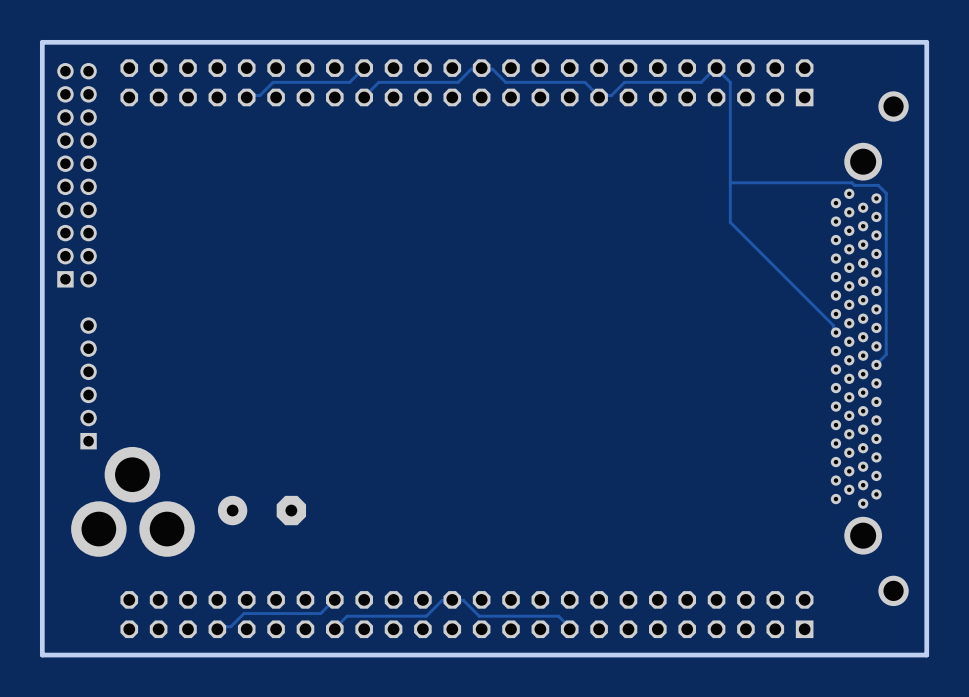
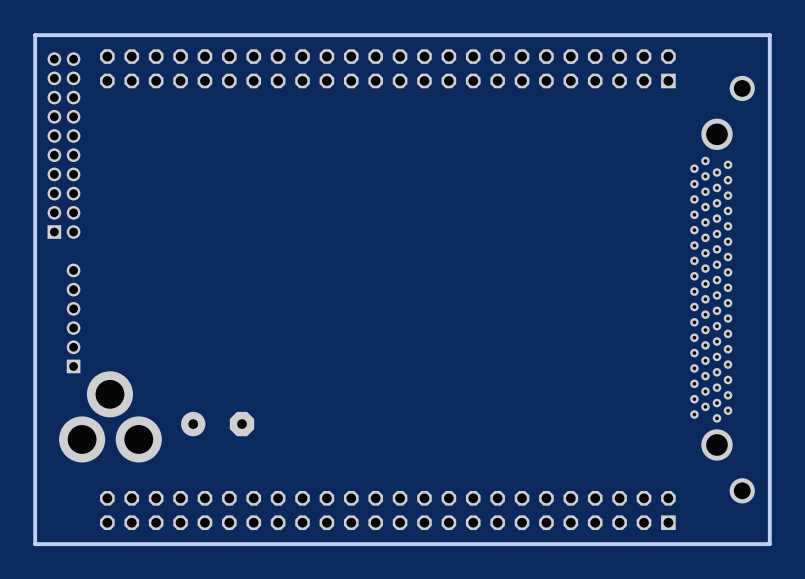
track: (364, 68) (349, 82) (273, 82) (259, 95) (249, 95) (246, 97) -> none
track: (364, 97) (378, 82) (458, 82) (471, 69) (481, 68) (492, 69) (505, 82) (584, 82) (599, 97) (600, 95) (611, 95) (624, 82) (701, 82) (716, 68) (730, 82) (730, 222) (833, 325) (833, 330) (835, 332) -> none
track: (730, 182) (851, 182) (854, 185) (878, 185) (886, 193) (886, 354) (876, 364) -> none
track: (334, 599) (320, 613) (244, 613) (230, 626) (217, 626) (217, 629) -> none
track: (569, 629) (558, 616) (479, 616) (463, 600) (452, 599) (442, 600) (426, 616) (347, 616) (334, 629) -> none

